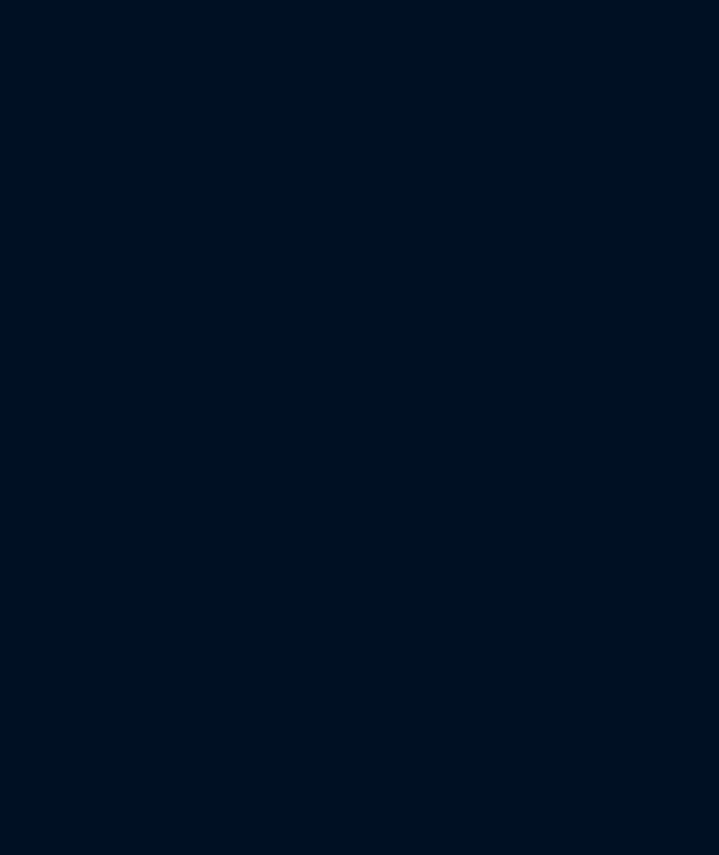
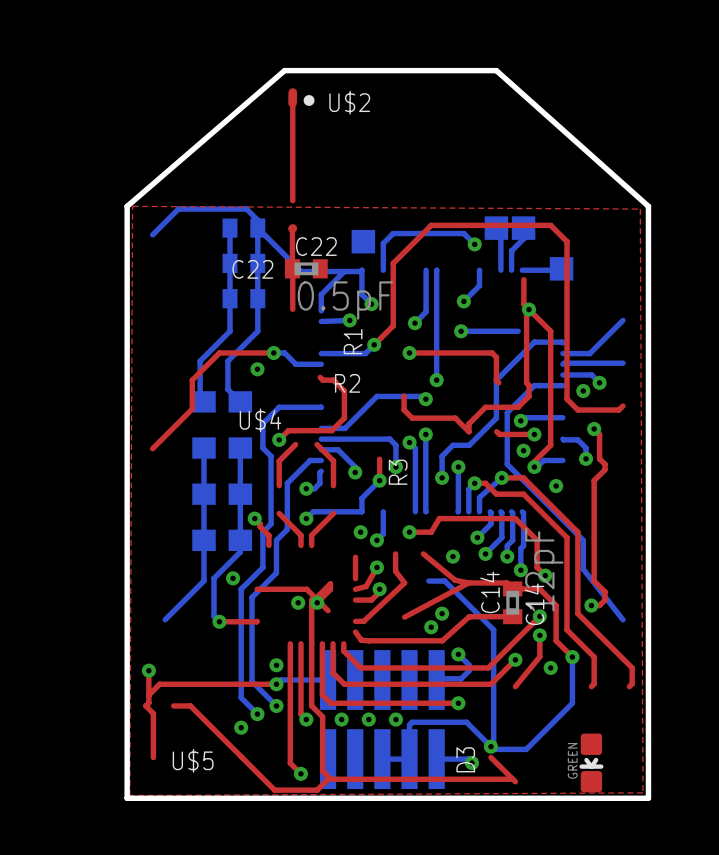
board edge: none -> (284, 70) (496, 70) (648, 206) (648, 798) (127, 798) (127, 206) (284, 70)
top track: none -> (292, 92) (292, 103)
drawing: none -> [303, 95, 315, 106]
text: none -> U$2 (349, 102)
top track: none -> (292, 103) (292, 200)
top zone outline: none -> (132, 206) (640, 209) (643, 792) (129, 795) (132, 206)
bottom track: none -> (230, 228) (230, 331) (200, 361) (200, 398)
part: none -> (243, 228)
bottom track: none -> (257, 228) (301, 271) (361, 270) (361, 294) (371, 304)
top track: none -> (292, 228) (292, 309)
bottom track: none -> (496, 228) (500, 232) (500, 270)
part: none -> (496, 228)
bottom track: none -> (523, 228) (523, 238) (511, 250) (511, 270)
part: none -> (523, 228)
bottom track: none -> (152, 234) (178, 209) (246, 209) (257, 220) (257, 331) (227, 361) (227, 389) (240, 401)
part: none -> (363, 241)
bottom track: none -> (474, 244) (463, 233) (393, 233) (383, 243) (383, 270)
via: none -> (474, 244)
part: none -> (243, 263)
C22: none -> 0.5pF (306, 268)
bottom track: none -> (561, 268) (522, 270)
part: none -> (561, 268)
text: none -> C22 (252, 269)
bottom track: none -> (426, 270) (426, 312) (414, 323)
bottom track: none -> (436, 270) (436, 380)
bottom track: none -> (479, 270) (479, 285) (463, 301)
bottom track: none -> (344, 271) (321, 294) (321, 310)
top track: none -> (523, 279) (523, 304) (550, 331) (550, 445) (534, 461) (534, 467)
part: none -> (243, 298)
via: none -> (463, 301)
via: none -> (371, 304)
top track: none -> (528, 309) (526, 311) (526, 382) (528, 385) (528, 396) (518, 407) (485, 407) (468, 423) (468, 431) (455, 418) (412, 418) (404, 410) (404, 396)
via: none -> (528, 309)
bottom track: none -> (349, 320) (321, 321)
via: none -> (349, 320)
bottom track: none -> (622, 320) (589, 353) (562, 353)
via: none -> (414, 323)
bottom track: none -> (461, 331) (518, 331)
via: none -> (461, 331)
text: none -> R1 (353, 341)
bottom track: none -> (562, 342) (534, 342) (496, 380) (496, 418) (469, 445) (452, 445) (442, 456) (442, 477)
bottom track: none -> (374, 344) (365, 353) (321, 353)
top track: none -> (374, 344) (393, 325) (393, 263) (431, 225) (550, 225) (567, 241) (567, 399) (577, 410) (618, 410) (622, 405)
via: none -> (374, 344)
bottom track: none -> (273, 353) (284, 353) (295, 364) (321, 364)
top track: none -> (273, 353) (219, 353) (192, 380) (192, 409) (152, 448)
via: none -> (273, 353)
top track: none -> (409, 353) (492, 353) (496, 357) (496, 380) (498, 382)
via: none -> (409, 353)
bottom track: none -> (622, 363) (562, 364)
via: none -> (257, 369)
bottom track: none -> (562, 374) (591, 374) (599, 382)
top track: none -> (320, 377) (322, 380) (333, 380) (344, 391) (344, 418) (331, 430) (288, 430) (279, 439)
via: none -> (436, 380)
via: none -> (599, 382)
text: none -> R2 (347, 383)
bottom track: none -> (562, 385) (534, 385) (507, 412) (507, 464) (583, 540) (583, 569) (622, 619)
via: none -> (583, 391)
bottom track: none -> (425, 399) (423, 396) (376, 396) (344, 428) (321, 428)
via: none -> (425, 399)
part: none -> (222, 401)
bottom track: none -> (321, 407) (279, 407) (262, 423) (262, 448) (271, 456) (271, 524) (262, 532) (262, 567) (241, 589) (241, 697) (257, 714)
bottom track: none -> (562, 417) (523, 417) (520, 420)
text: none -> U$4 (260, 420)
via: none -> (520, 420)
top track: none -> (594, 429) (599, 434) (599, 458) (605, 464) (605, 469) (594, 480) (594, 581) (605, 591) (605, 600) (599, 605) (591, 605)
via: none -> (594, 429)
top track: none -> (496, 431) (499, 434) (534, 434)
bottom track: none -> (425, 434) (425, 511)
via: none -> (425, 434)
via: none -> (534, 434)
via: none -> (279, 439)
bottom track: none -> (321, 439) (389, 439) (395, 445) (395, 467)
bottom track: none -> (562, 439) (577, 439) (586, 448) (586, 458)
bottom track: none -> (409, 442) (415, 448) (415, 511)
via: none -> (409, 442)
top track: none -> (295, 444) (279, 461) (279, 485)
top track: none -> (317, 444) (333, 461) (333, 485)
bottom track: none -> (204, 448) (204, 580) (165, 619)
part: none -> (222, 448)
bottom track: none -> (240, 448) (240, 552) (214, 578) (214, 616) (219, 621)
bottom track: none -> (321, 449) (337, 449) (355, 467) (355, 472)
via: none -> (523, 450)
via: none -> (586, 458)
top track: none -> (379, 459) (379, 480)
bottom track: none -> (321, 460) (310, 460) (287, 483) (287, 529) (276, 540) (276, 572) (252, 597) (252, 681) (276, 705)
bottom track: none -> (562, 460) (543, 460) (537, 467) (534, 467)
via: none -> (395, 467)
bottom track: none -> (458, 467) (458, 511)
via: none -> (458, 467)
via: none -> (534, 467)
bottom track: none -> (321, 471) (319, 483) (314, 488) (306, 488)
via: none -> (355, 472)
text: none -> R3 (398, 472)
via: none -> (442, 477)
bottom track: none -> (501, 477) (479, 497) (479, 511)
top track: none -> (501, 477) (523, 477) (577, 532) (577, 613) (632, 667) (632, 683) (629, 686)
via: none -> (501, 477)
bottom track: none -> (379, 480) (361, 498) (361, 511) (313, 511) (306, 518)
via: none -> (379, 480)
bottom track: none -> (474, 483) (468, 489) (468, 511)
top track: none -> (474, 483) (485, 483) (496, 494) (523, 494) (567, 537) (567, 629) (594, 657) (594, 683) (591, 686)
via: none -> (474, 483)
via: none -> (556, 486)
via: none -> (306, 488)
part: none -> (222, 494)
bottom track: none -> (383, 511) (383, 533) (376, 540)
bottom track: none -> (490, 511) (490, 524) (477, 537)
bottom track: none -> (500, 511) (501, 537) (485, 553)
bottom track: none -> (511, 511) (512, 540) (507, 545) (507, 556)
bottom track: none -> (522, 511) (523, 545) (520, 548) (520, 570)
top track: none -> (279, 513) (301, 535) (301, 545)
top track: none -> (333, 513) (311, 535) (311, 545)
top track: none -> (254, 518) (268, 535) (268, 545)
via: none -> (254, 518)
via: none -> (306, 518)
via: none -> (360, 532)
top track: none -> (409, 532) (431, 532) (439, 518) (515, 518) (537, 540) (537, 567) (545, 575)
via: none -> (409, 532)
via: none -> (477, 537)
part: none -> (222, 540)
via: none -> (376, 540)
top track: none -> (395, 553) (395, 571) (404, 582) (363, 621) (355, 621)
top track: none -> (423, 553) (455, 580) (468, 582)
via: none -> (485, 553)
via: none -> (452, 556)
via: none -> (507, 556)
top track: none -> (355, 557) (355, 578)
top track: none -> (376, 567) (366, 586) (355, 589)
via: none -> (376, 567)
via: none -> (520, 570)
via: none -> (545, 575)
via: none -> (233, 578)
bottom track: none -> (428, 581) (444, 581) (493, 629) (493, 743) (490, 746)
top track: none -> (468, 582) (506, 582) (512, 588) (539, 588) (556, 605) (556, 640) (572, 657)
top track: none -> (468, 582) (404, 617)
top track: none -> (257, 589) (306, 589) (328, 610)
top track: none -> (379, 589) (371, 600) (355, 600)
via: none -> (379, 589)
text: none -> C14 (534, 604)
via: none -> (298, 602)
top track: none -> (317, 602) (330, 589) (330, 583) (314, 599) (311, 599) (311, 705) (322, 716) (322, 771) (330, 779)
via: none -> (317, 602)
C14: none -> 12pF (512, 602)
via: none -> (591, 605)
via: none -> (442, 613)
top track: none -> (512, 616) (468, 617) (442, 640) (361, 640) (355, 632)
top track: none -> (539, 616) (488, 667) (360, 667) (343, 651) (343, 643)
via: none -> (539, 616)
via: none -> (219, 621)
top track: none -> (257, 621) (219, 621)
via: none -> (431, 627)
top track: none -> (539, 635) (539, 656) (515, 686)
via: none -> (539, 635)
top track: none -> (290, 643) (290, 763) (300, 773)
top track: none -> (301, 643) (301, 714) (306, 719)
top track: none -> (322, 643) (322, 694) (330, 703) (458, 703)
top track: none -> (333, 643) (333, 672) (344, 684) (490, 684) (515, 659)
bottom track: none -> (458, 654) (469, 665) (469, 670) (461, 678) (436, 679)
via: none -> (458, 654)
bottom track: none -> (572, 657) (572, 703) (526, 749) (493, 749) (466, 722) (412, 722) (409, 724) (409, 759) (382, 759)
via: none -> (572, 657)
via: none -> (515, 659)
via: none -> (276, 665)
via: none -> (550, 667)
top track: none -> (148, 670) (148, 702) (145, 705) (153, 713) (153, 757)
via: none -> (148, 670)
bottom track: none -> (328, 679) (280, 679) (276, 684)
top track: none -> (276, 684) (159, 684) (148, 695)
via: none -> (276, 684)
via: none -> (458, 703)
top track: none -> (173, 705) (190, 705) (274, 790) (317, 790) (328, 779) (512, 779)
via: none -> (276, 705)
via: none -> (257, 714)
via: none -> (306, 719)
via: none -> (341, 719)
via: none -> (368, 719)
part: none -> (382, 719)
via: none -> (395, 719)
via: none -> (241, 727)
via: none -> (490, 746)
top track: none -> (490, 757) (515, 781)
bottom track: none -> (436, 759) (468, 759) (471, 762)
text: none -> U$5 (193, 760)
via: none -> (471, 762)
D3: none -> GREEN (591, 762)
via: none -> (300, 773)

